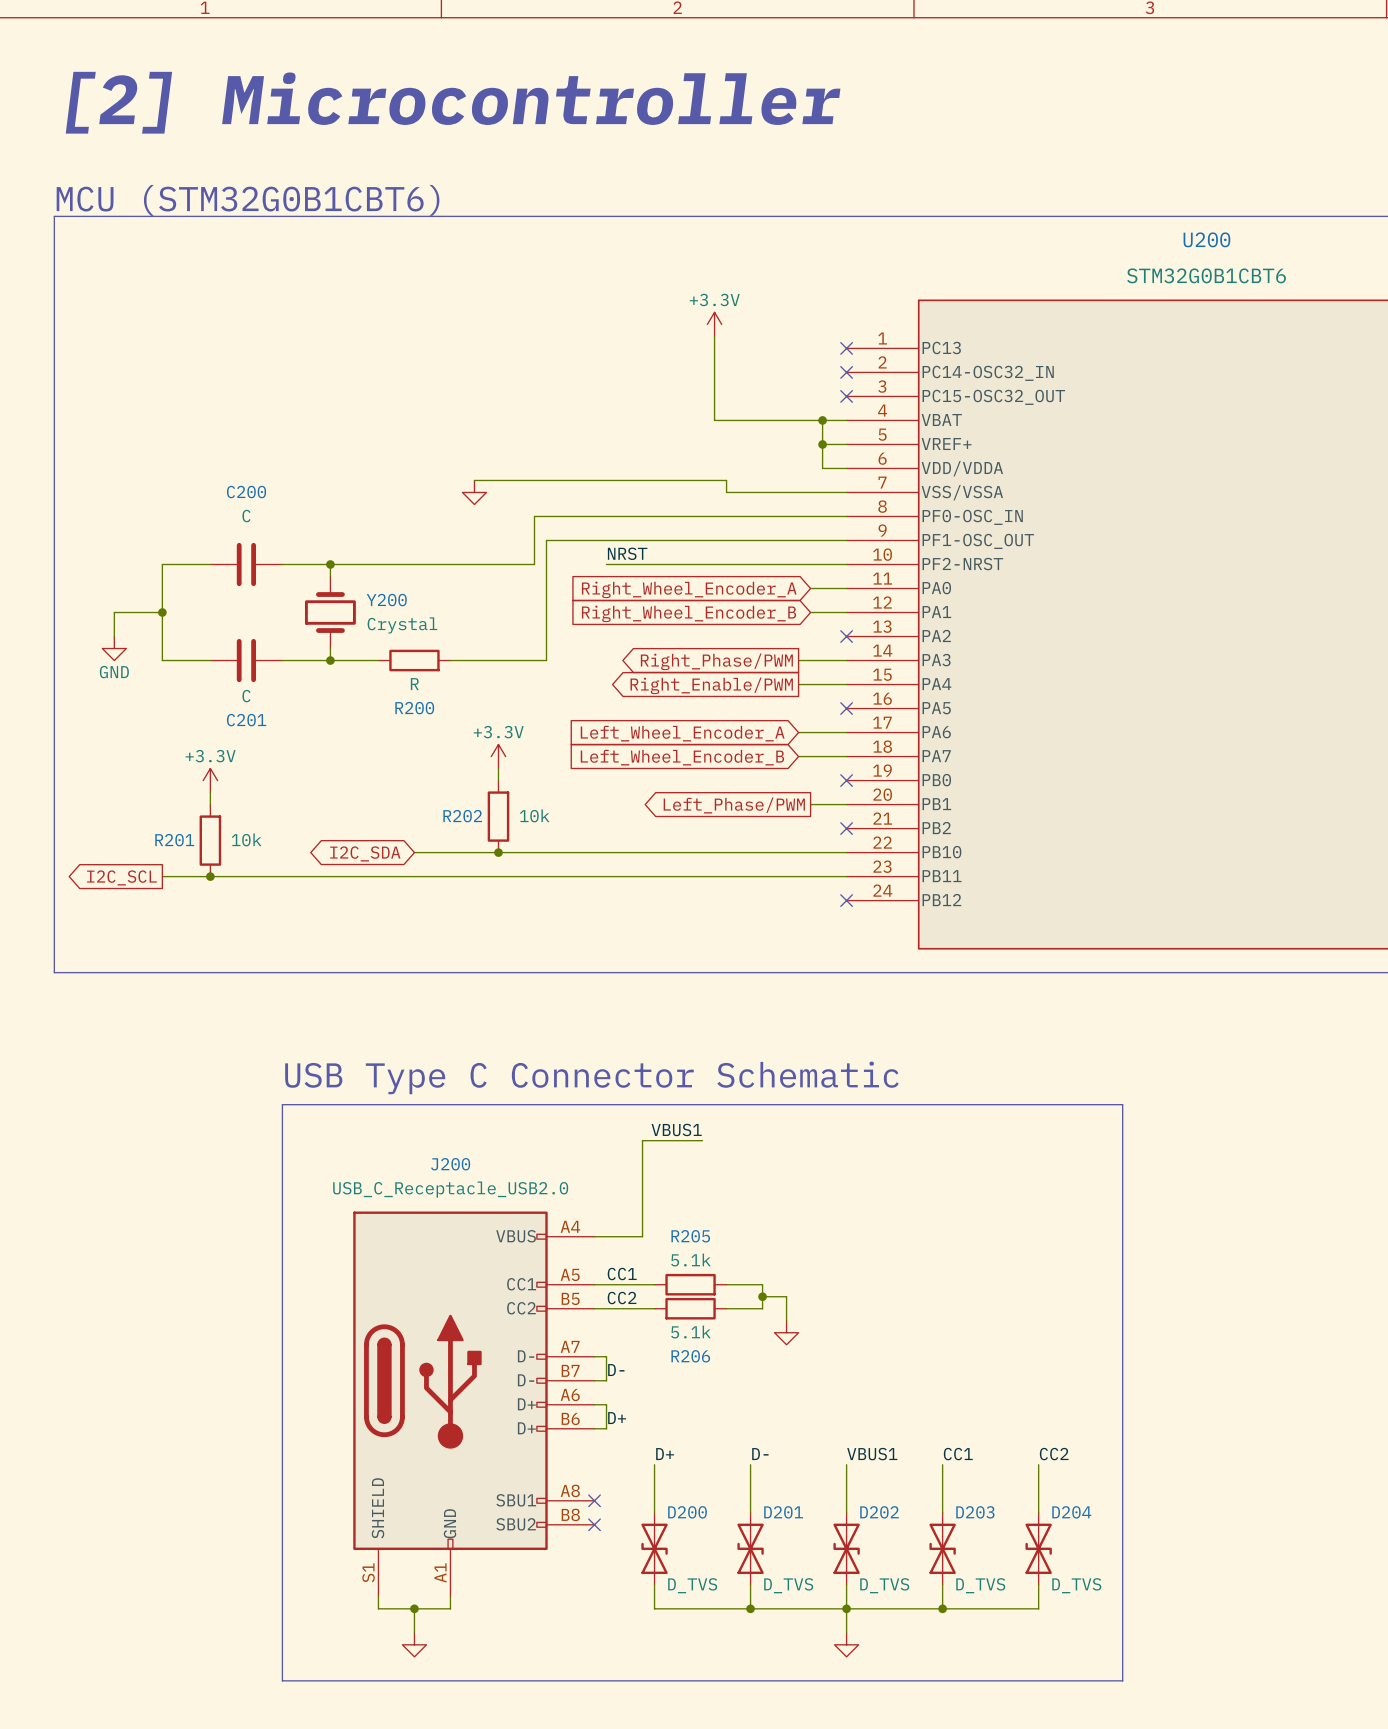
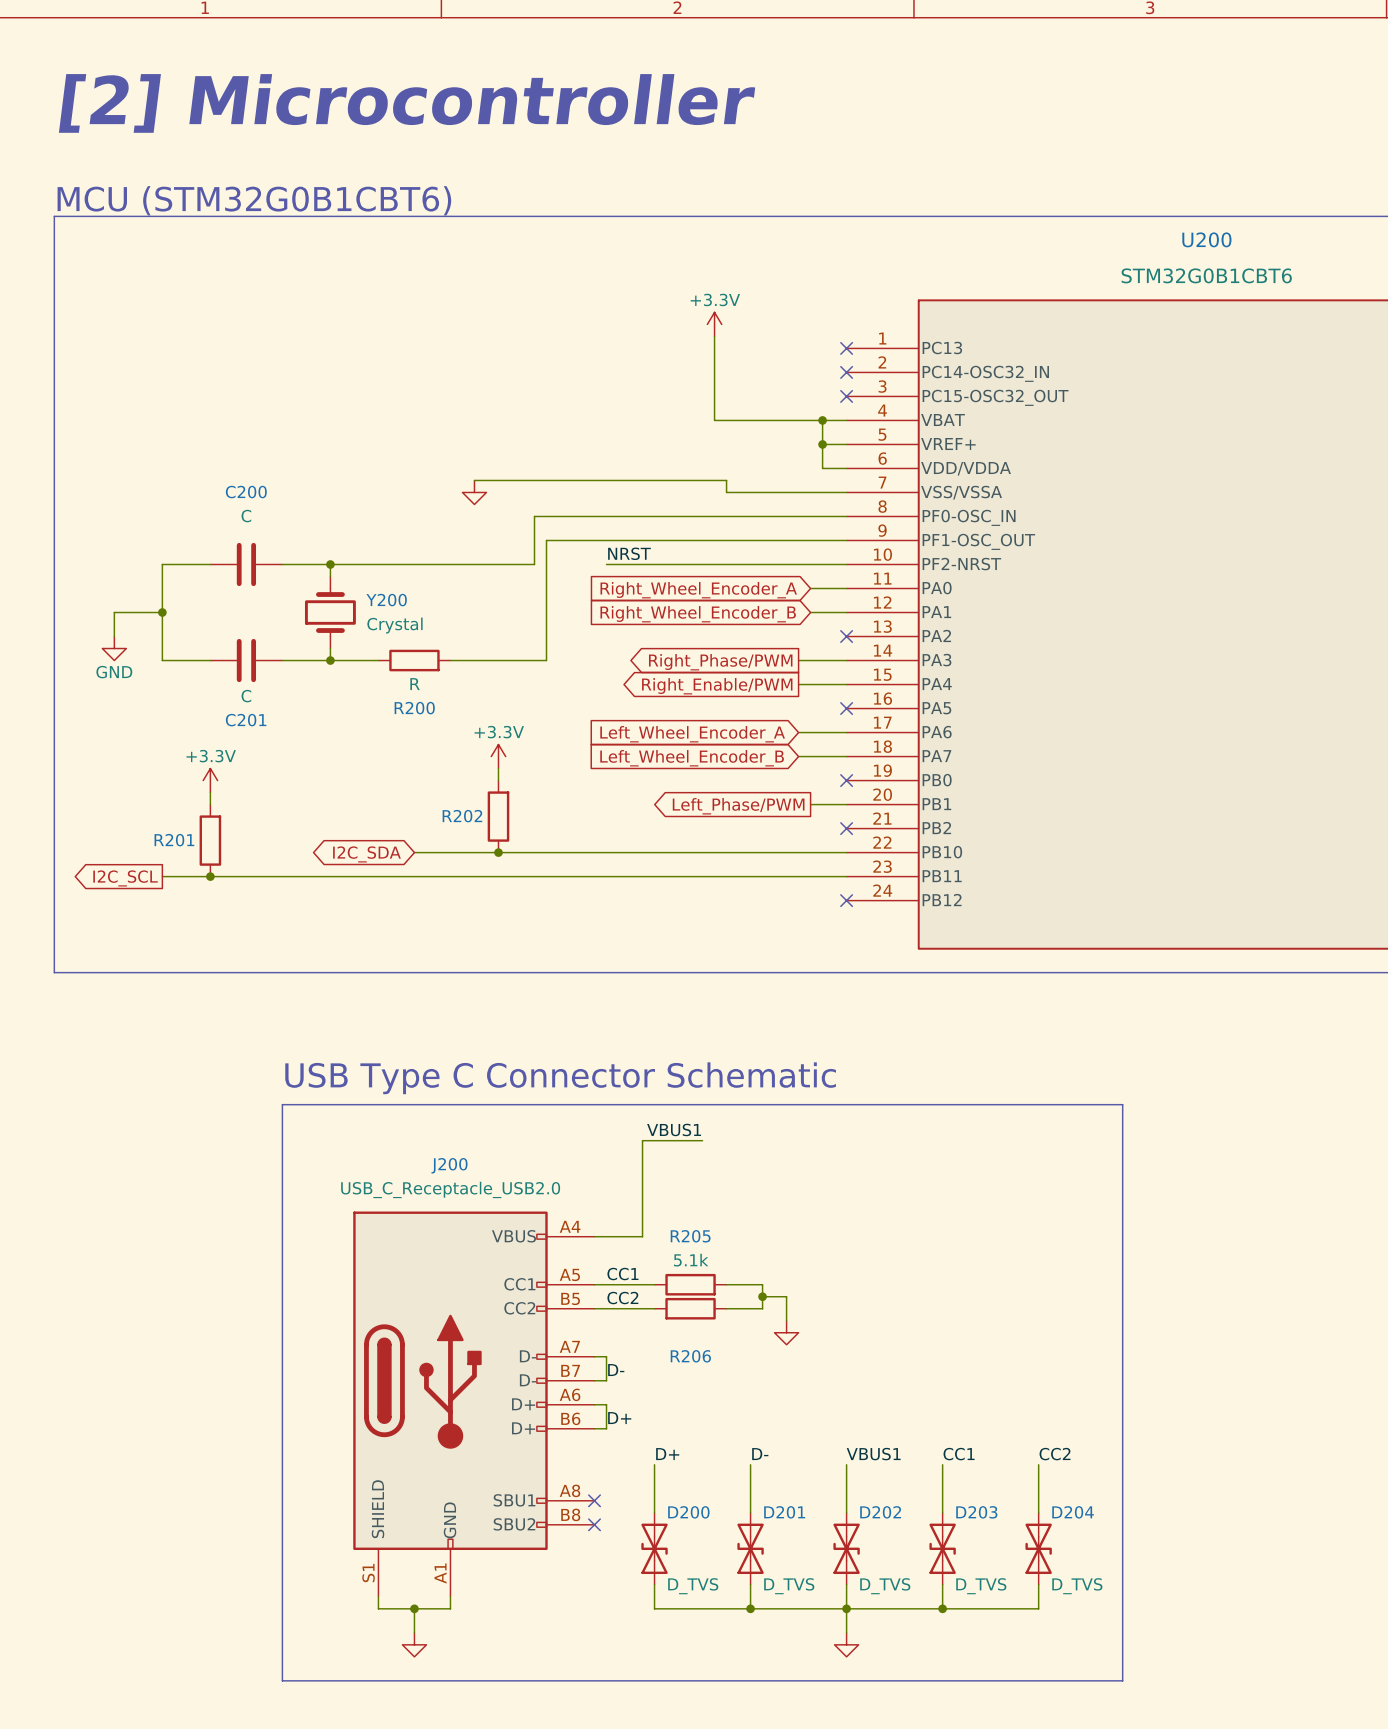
R202 value: 10k (534, 815) -> none
R201 value: 10k (246, 839) -> none
R206 value: 5.1k (690, 1332) -> none

